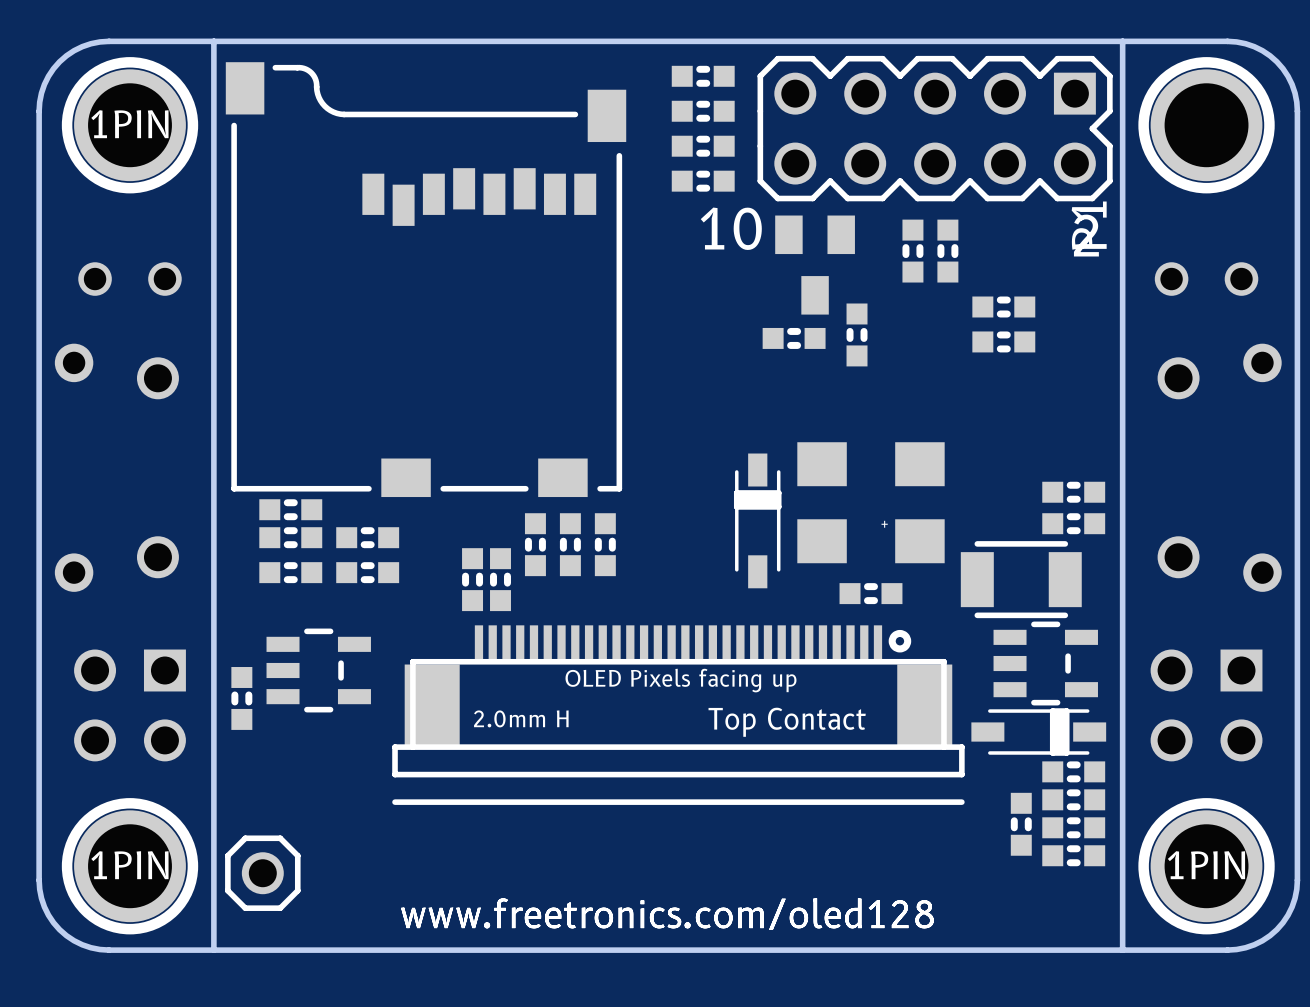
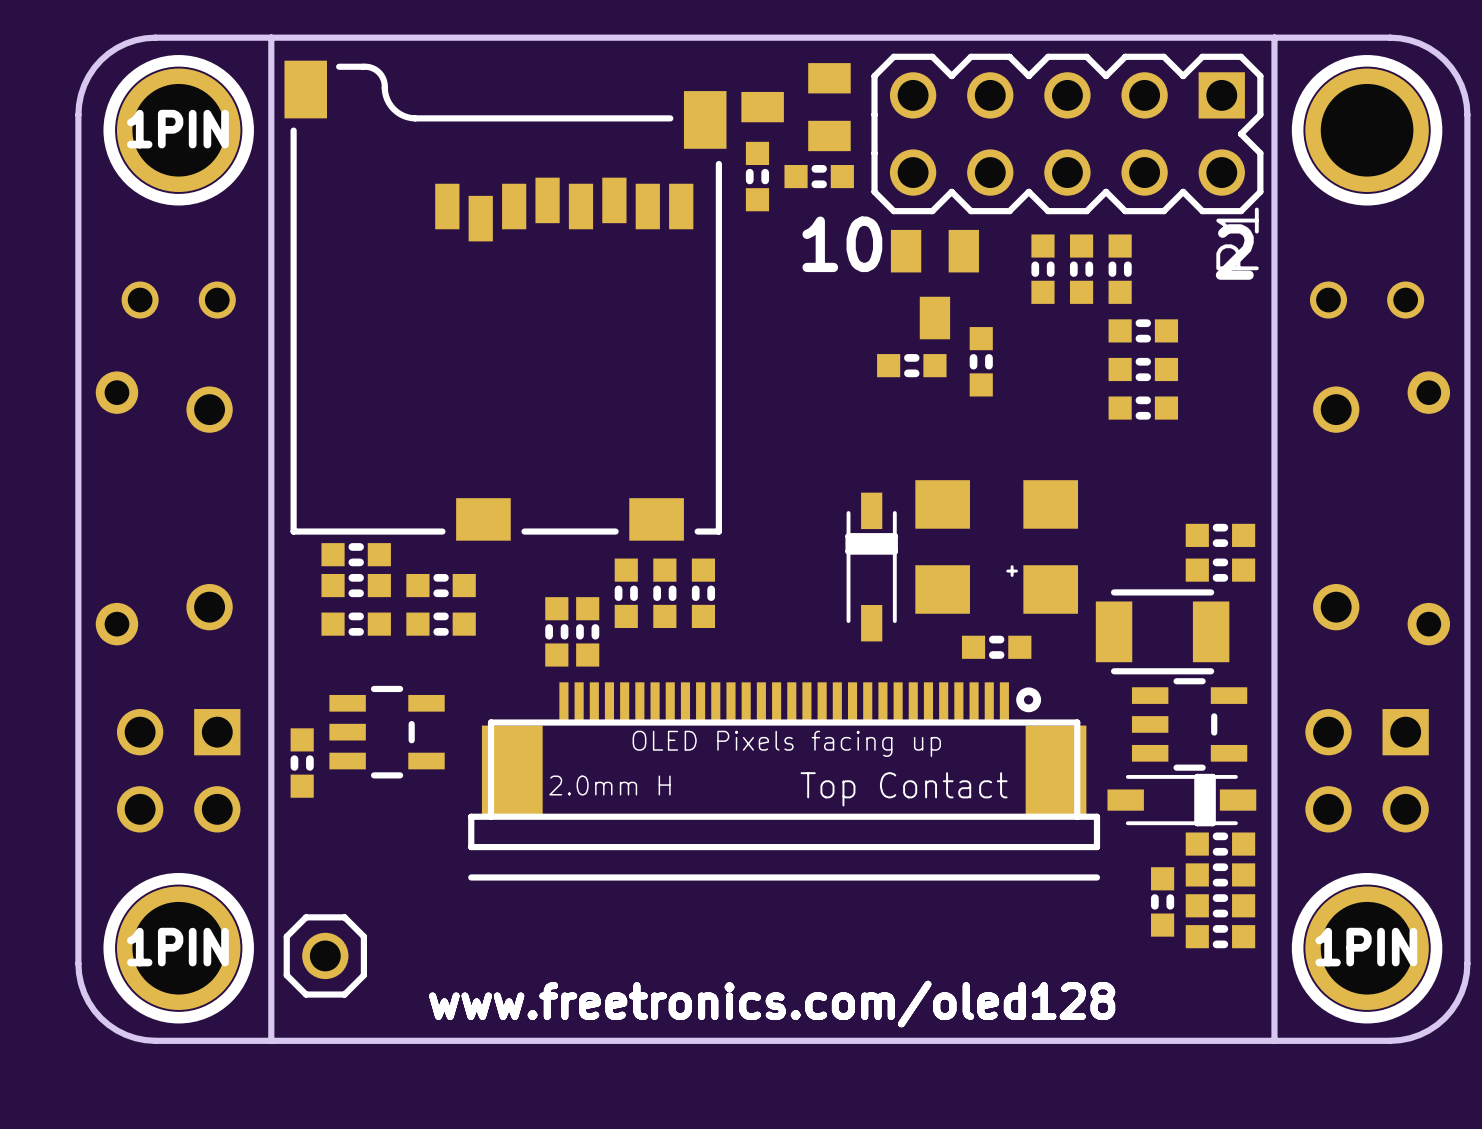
part: (703, 76) -> none
part: none -> (796, 107)
part: (703, 111) -> none
part: (703, 146) -> none
part: none -> (757, 176)
part: none -> (819, 176)
part: (703, 181) -> none
part: none -> (1120, 269)
part: none -> (1143, 408)

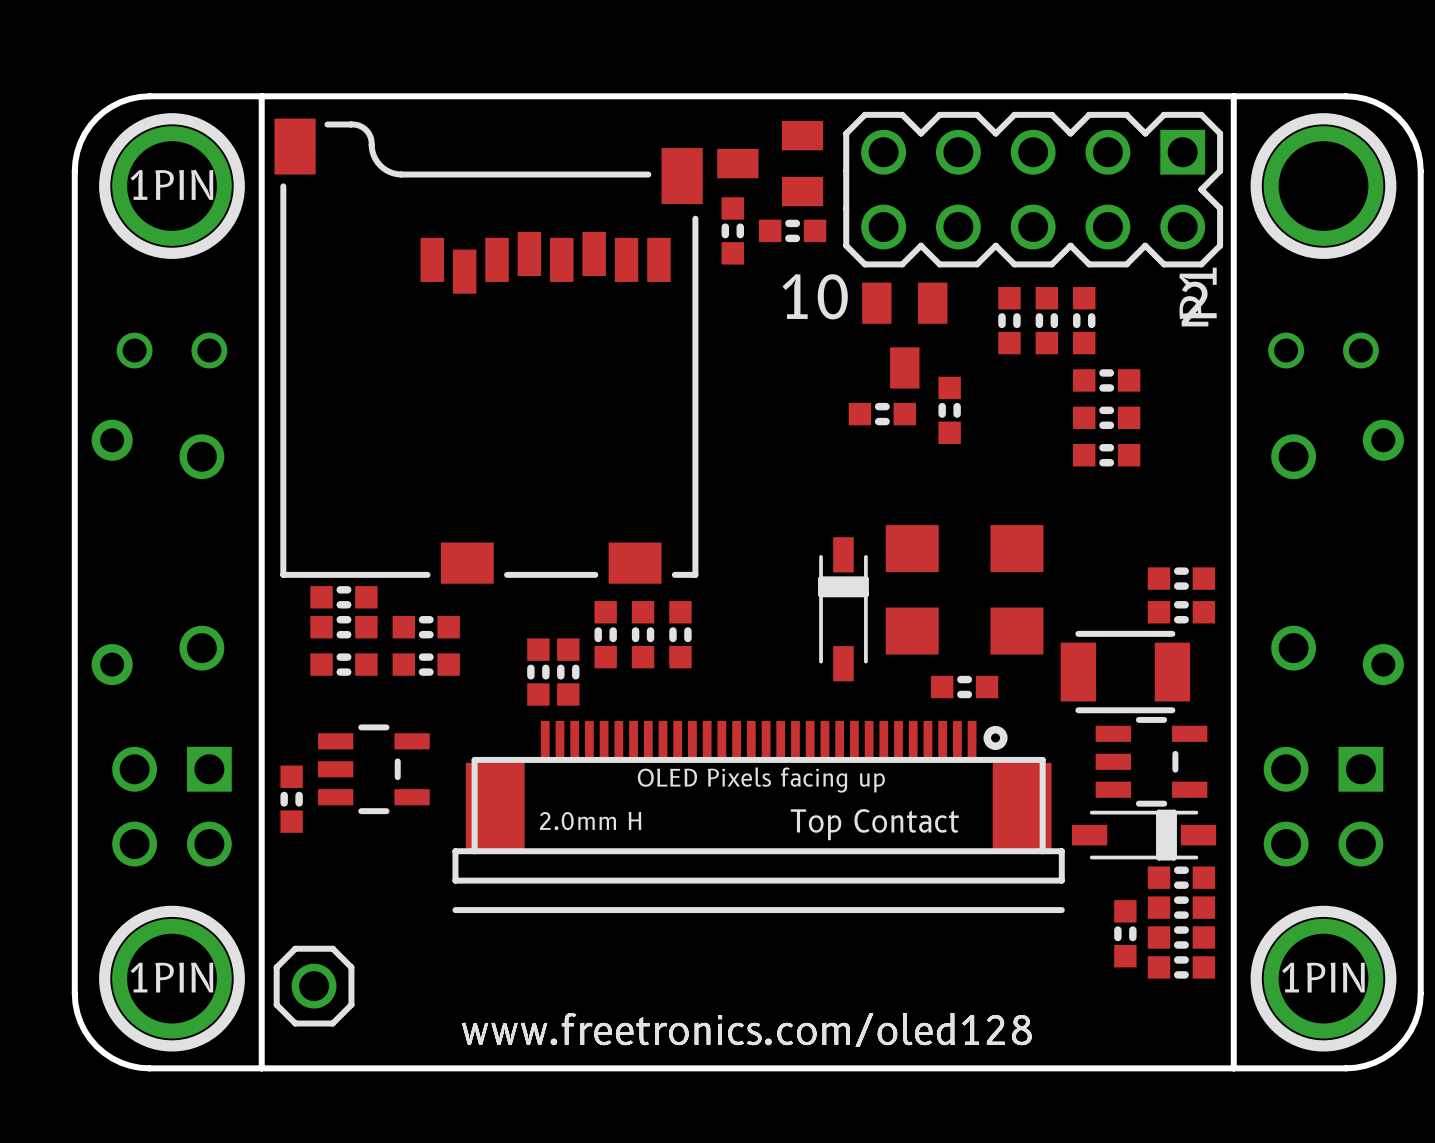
text: + (1012, 571) -> none

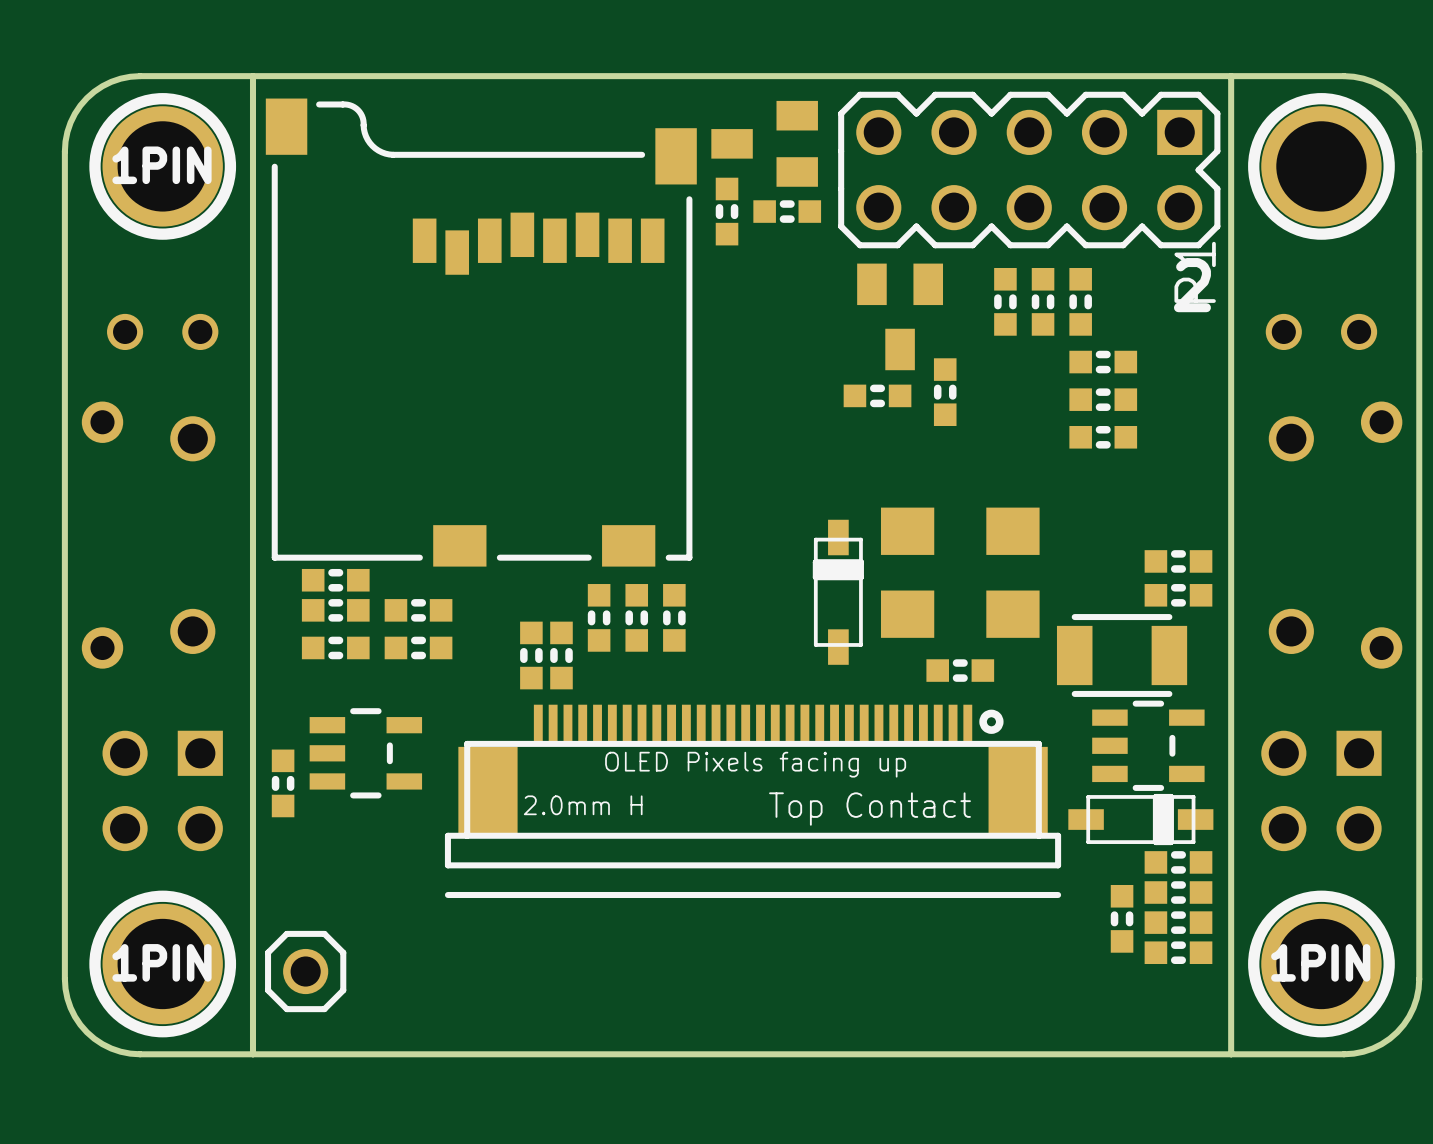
text: 10 (815, 296) -> none
part footprint: [818, 537, 869, 682] -> [812, 519, 864, 665]
part footprint: [1071, 809, 1217, 861] -> [1068, 793, 1214, 846]
text: www.freetronics.com/oled128 (746, 1029) -> none

